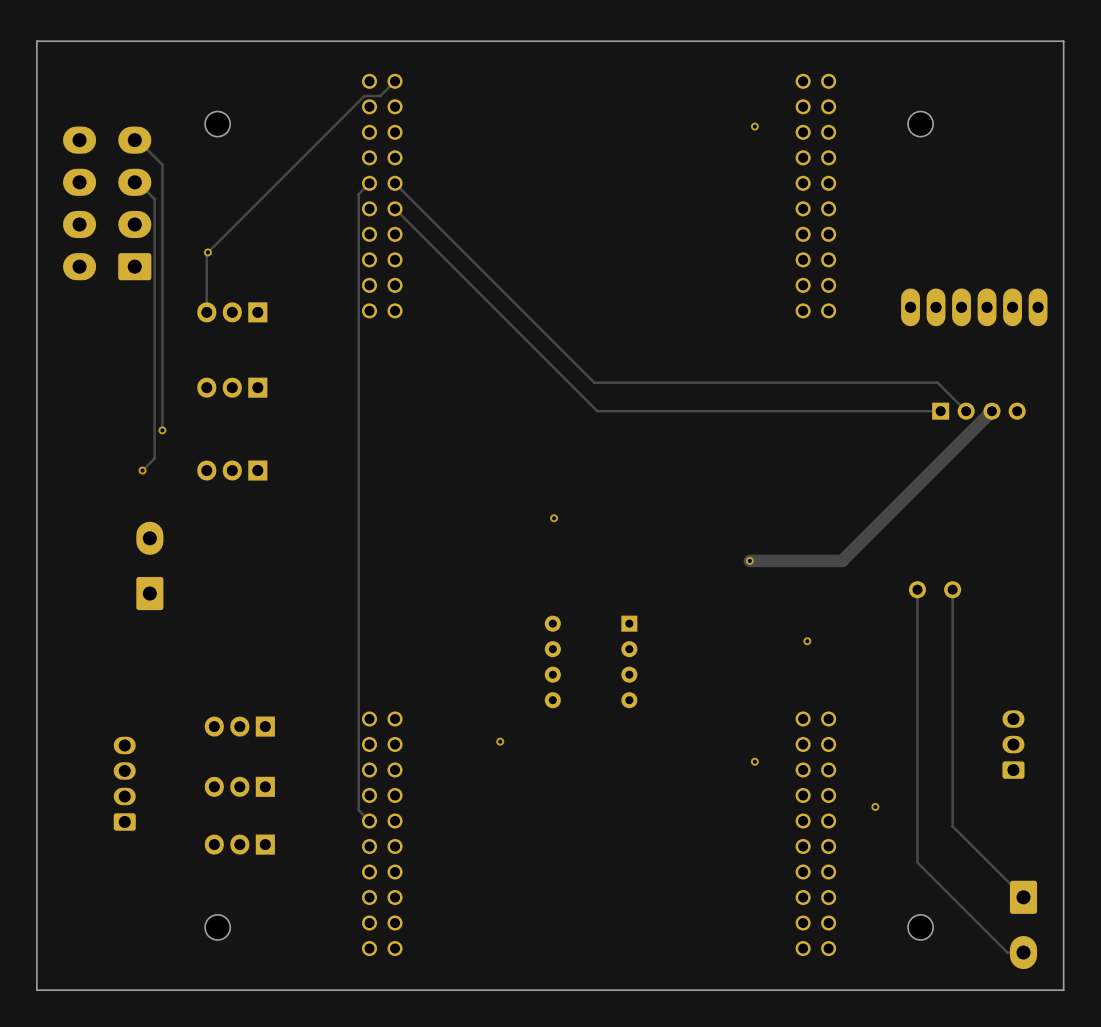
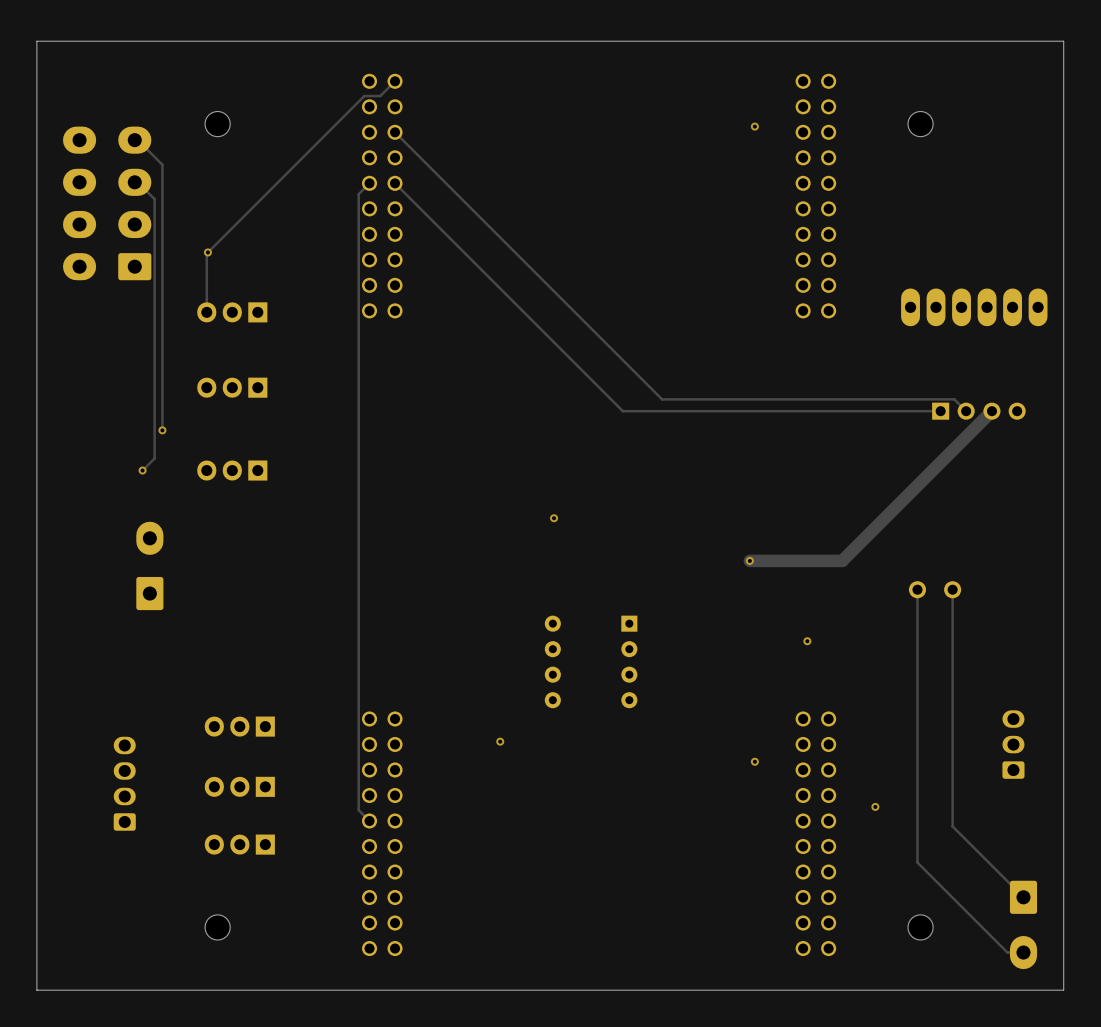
track: (395, 208) (597, 411) (622, 411) -> (594, 382) (622, 411)
track: (594, 382) (937, 382) (954, 399) -> (395, 132) (662, 399) (954, 399)

